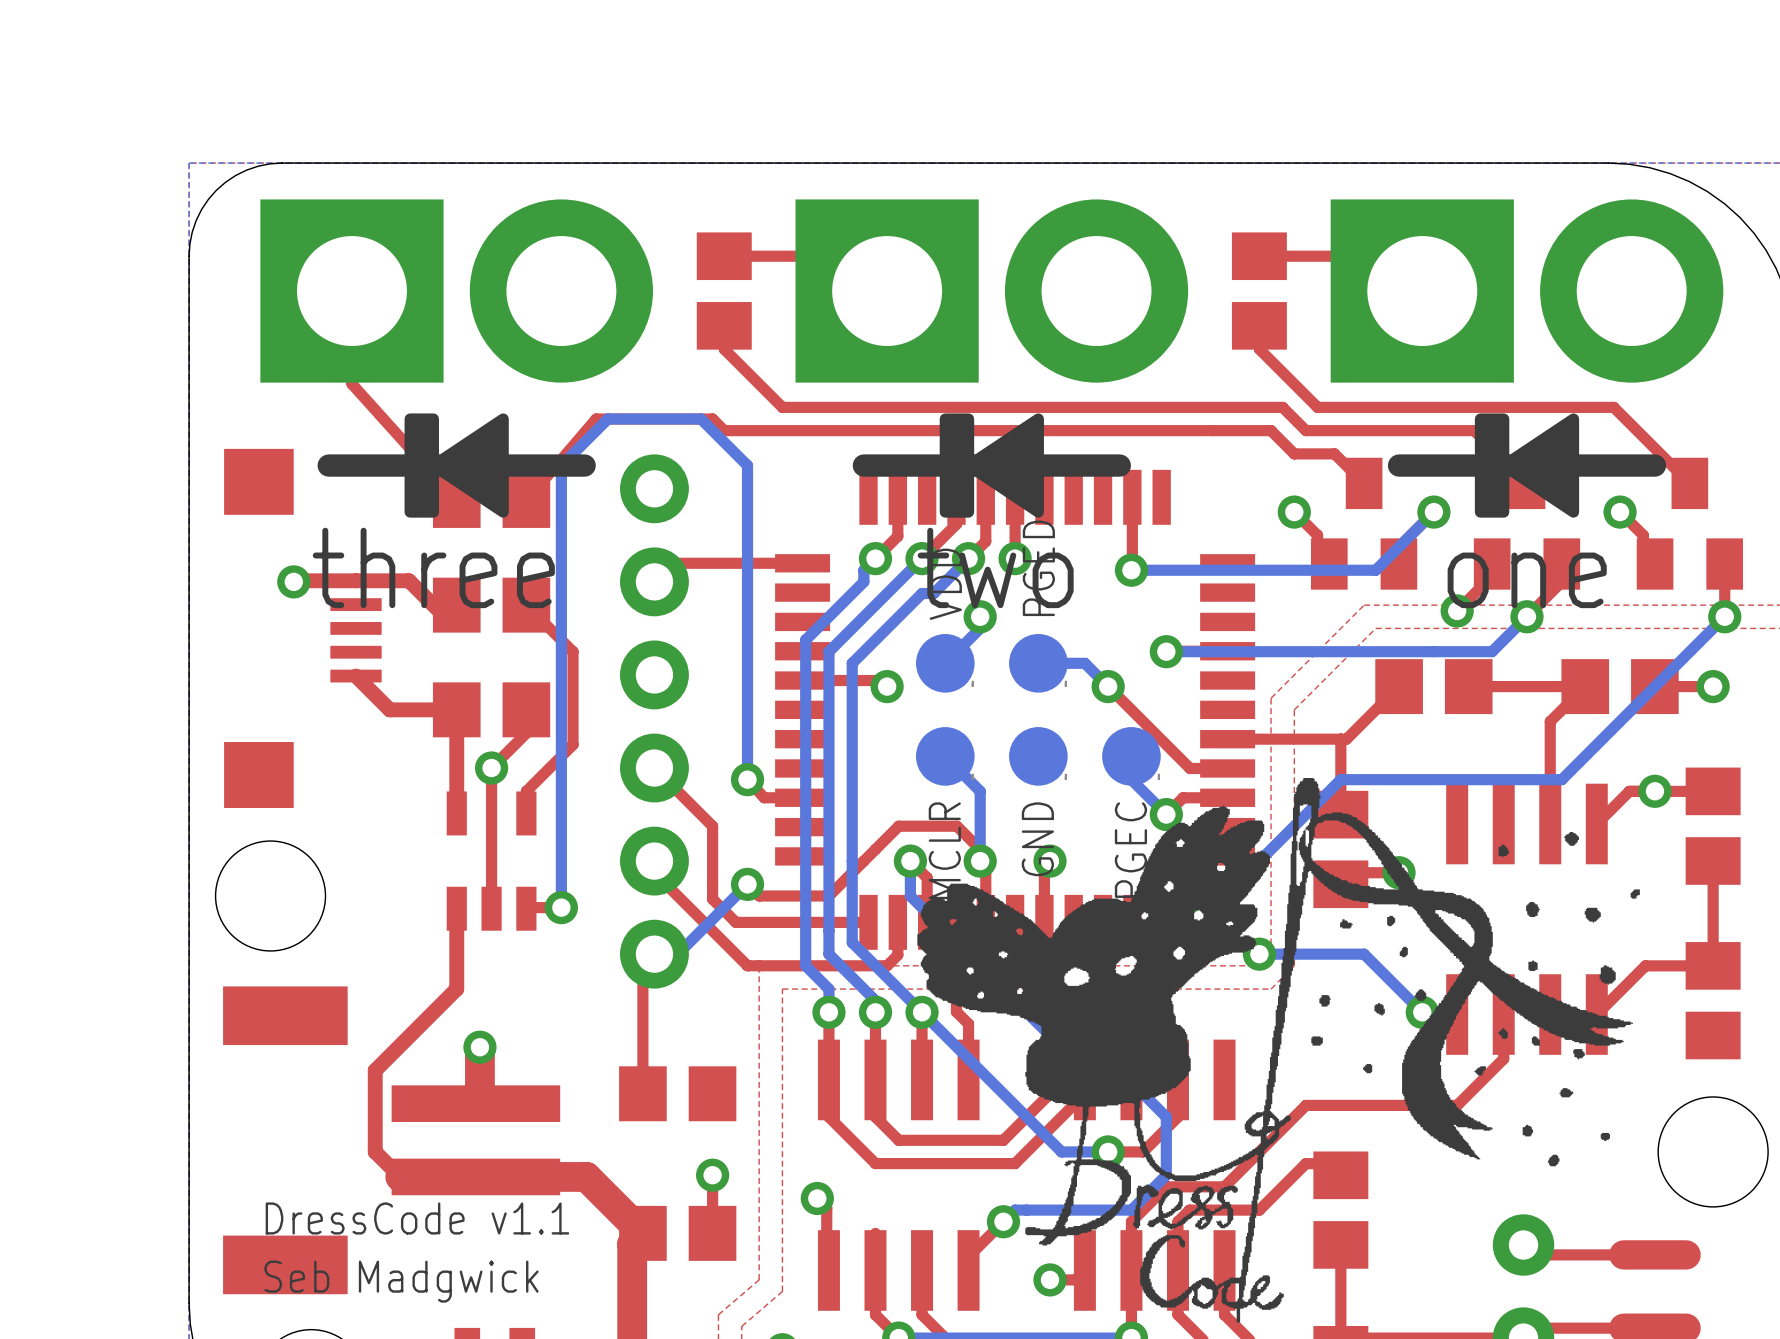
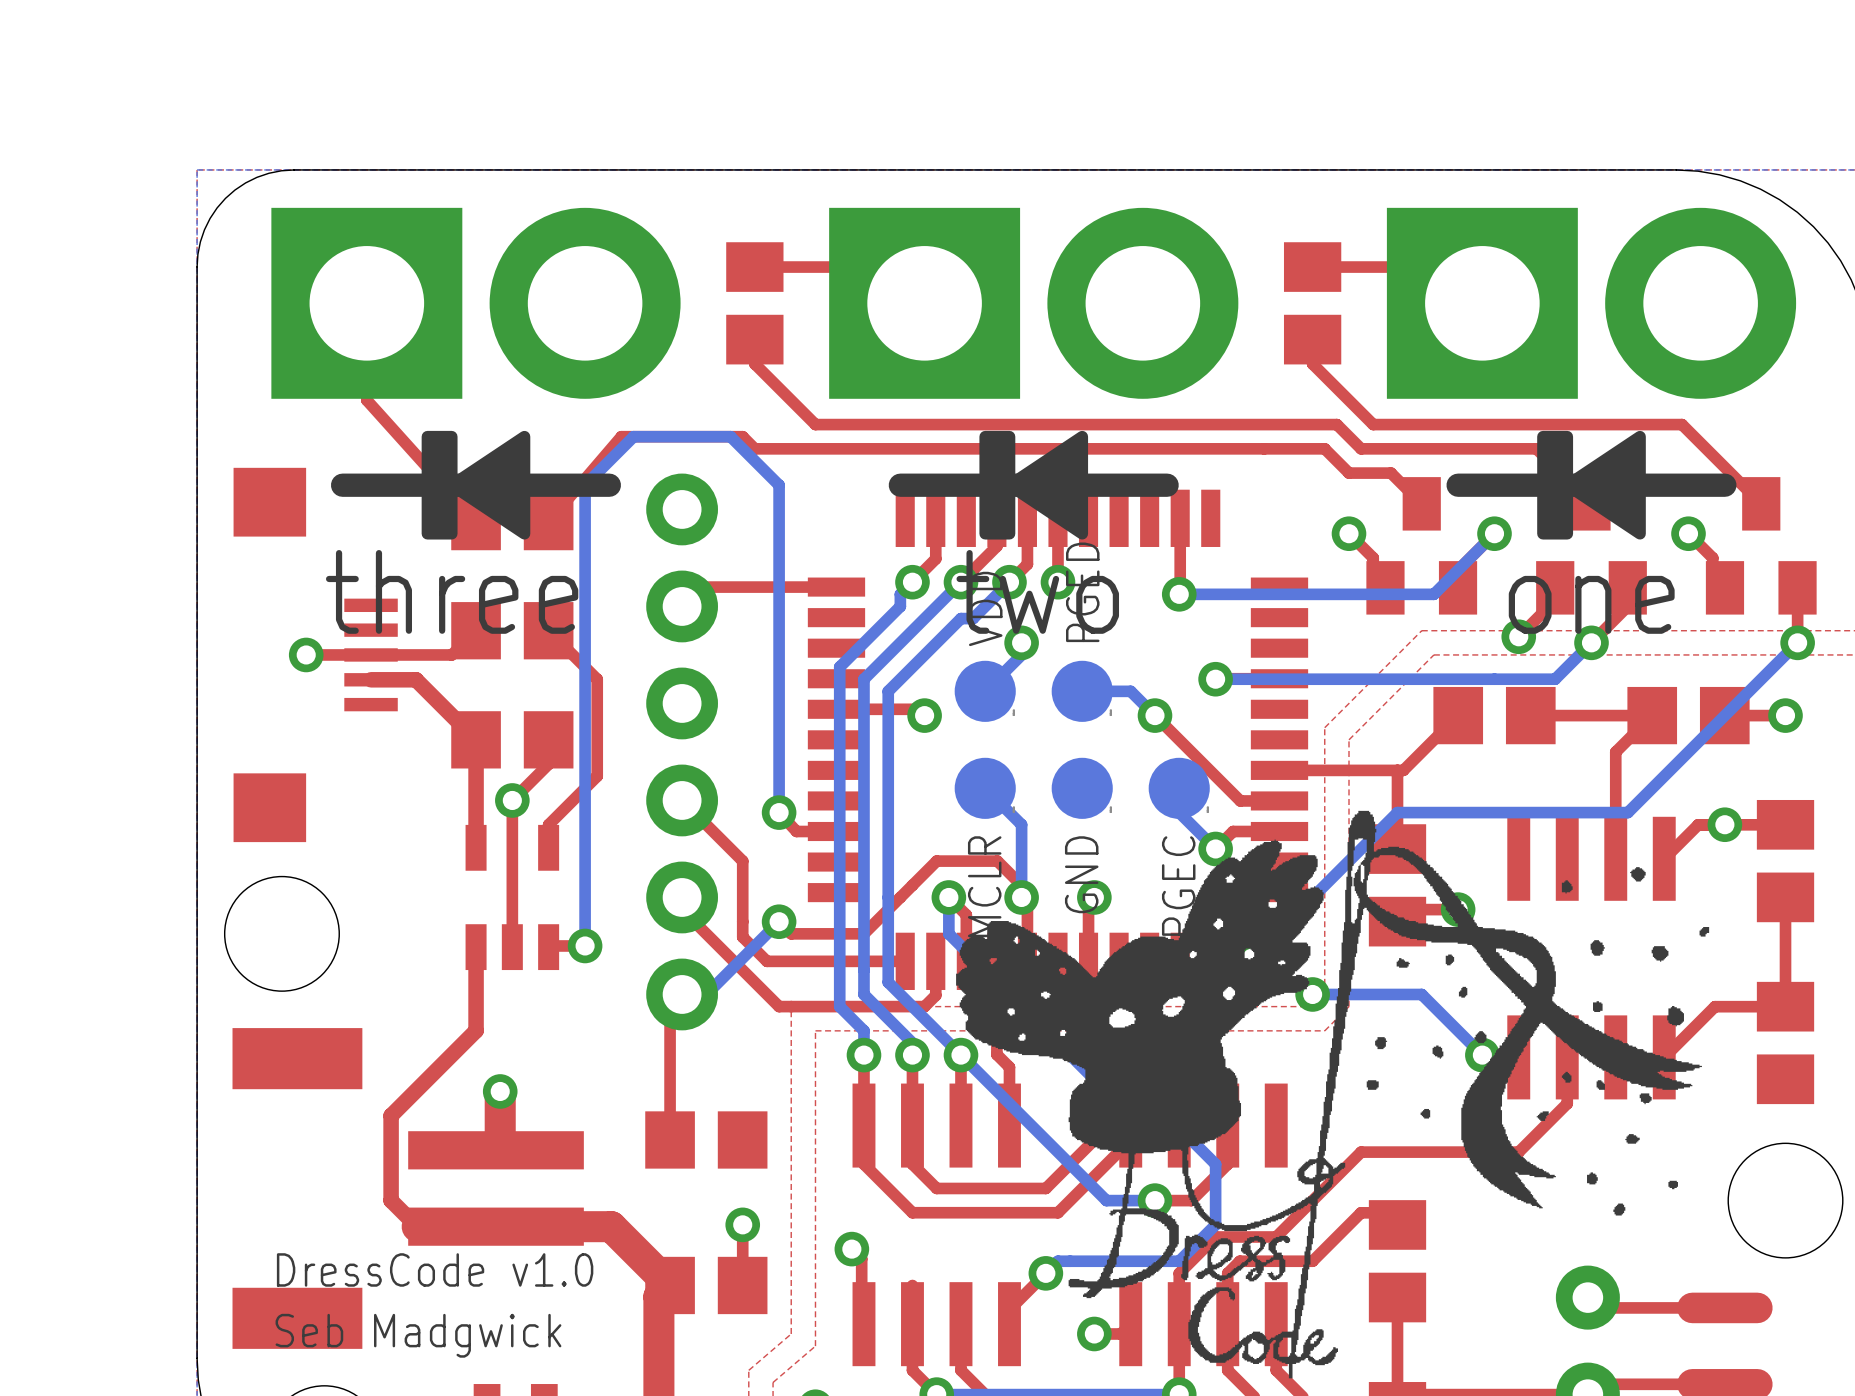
top track: (293, 581) (409, 580) (445, 616) -> (306, 654) (451, 654) (463, 642)
via position: (293, 581) -> (306, 654)
top track: (356, 676) (389, 709) (456, 709) -> (371, 679) (416, 679) (476, 739)
text: DressCode v1.1 (417, 1218) -> DressCode v1.0 (435, 1269)

